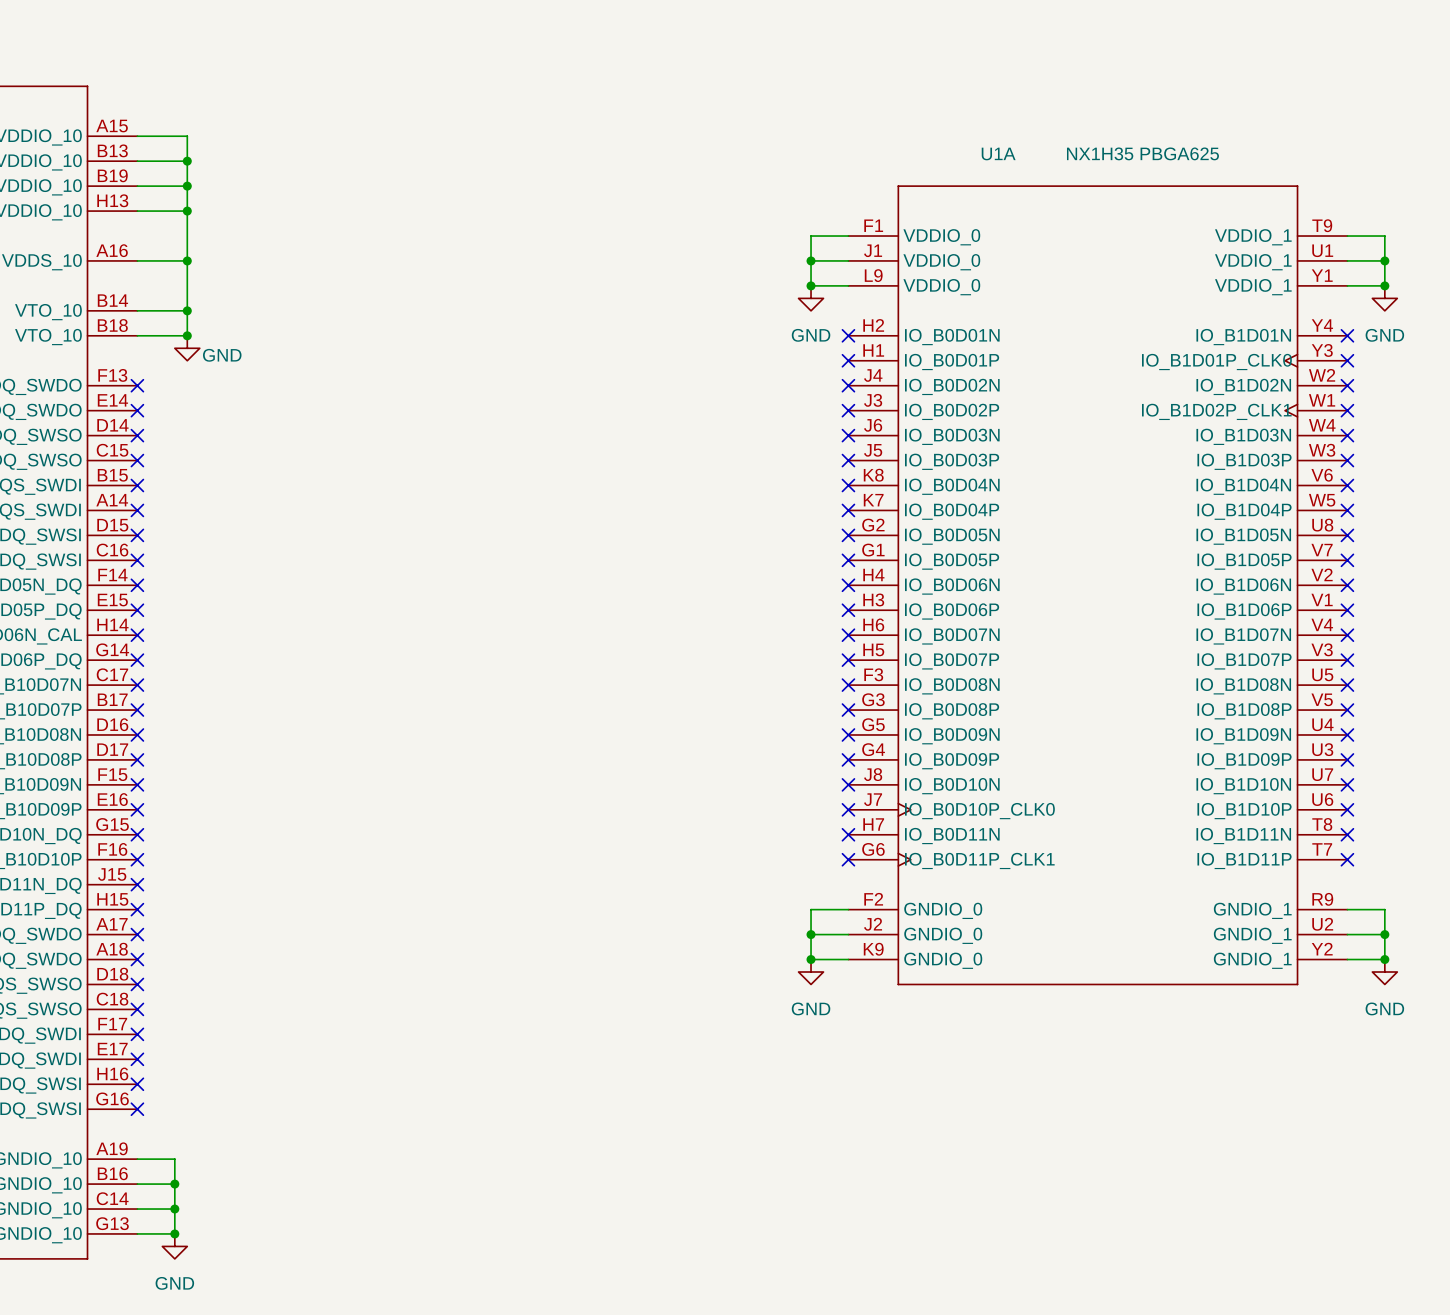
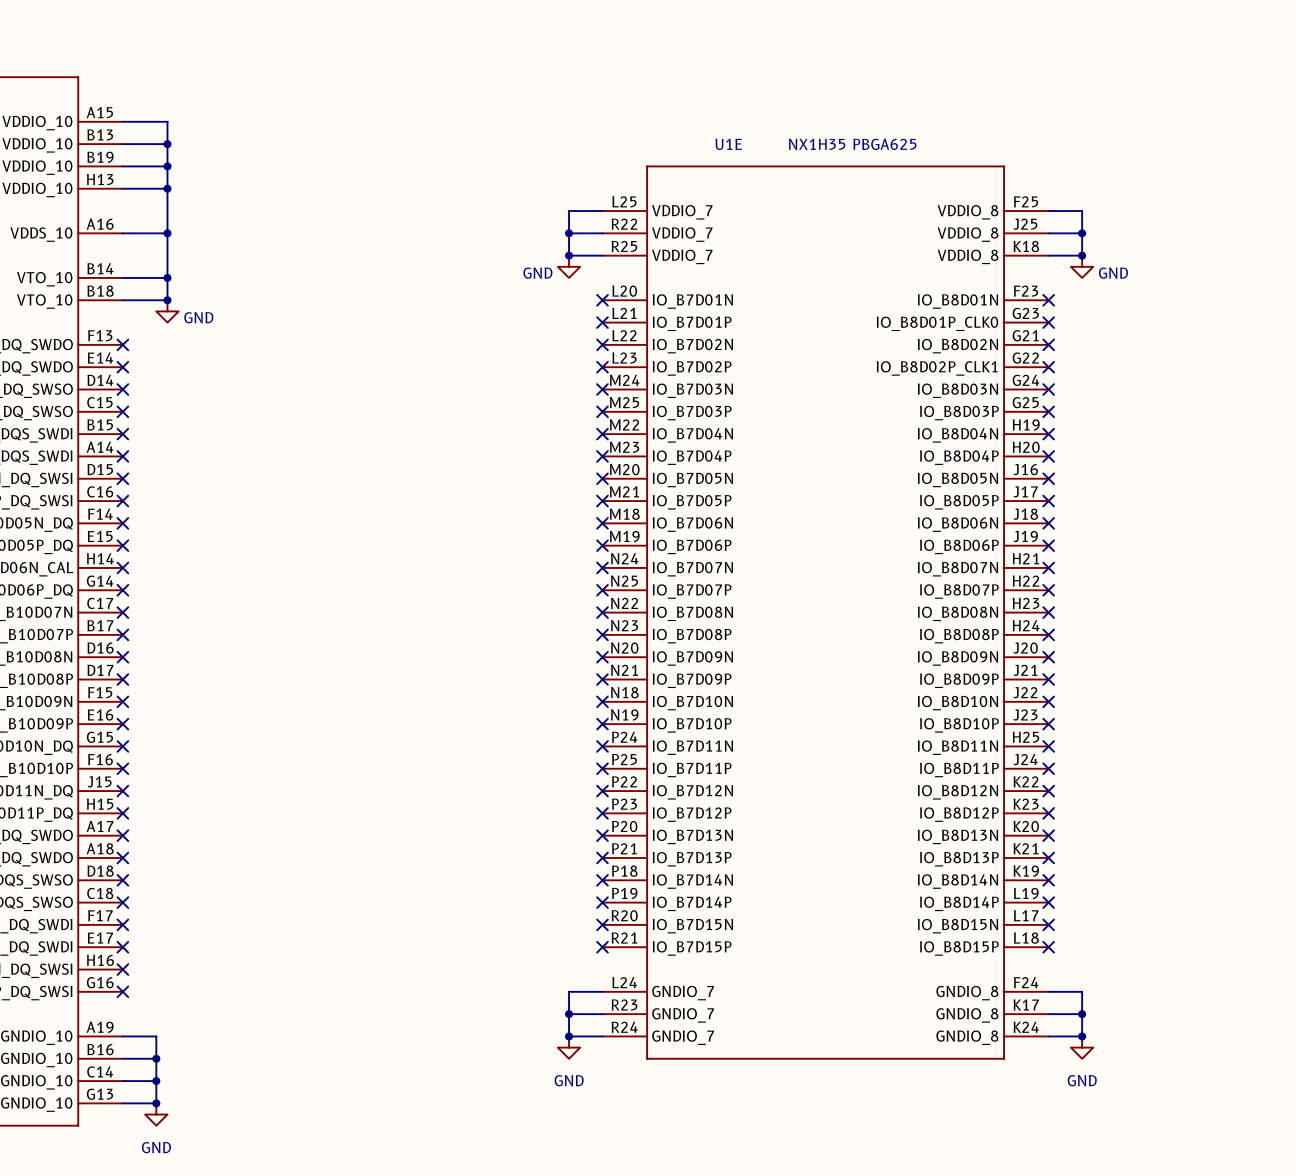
wire: (848, 236) (811, 236) (811, 285) (848, 285) -> (602, 211) (569, 211) (569, 255) (602, 255)
wire: (1347, 236) (1384, 236) (1384, 285) (1347, 285) -> (1048, 211) (1082, 211) (1082, 255) (1048, 255)
junction: none -> (569, 233)
wire: (811, 260) (848, 260) -> (569, 233) (602, 233)
junction: (811, 260) -> none
junction: none -> (1082, 233)
wire: (1347, 260) (1384, 260) -> (1048, 233) (1082, 233)
junction: (1384, 260) -> none
junction: none -> (569, 255)
junction: (811, 285) -> none
junction: none -> (1082, 255)
junction: (1384, 285) -> none
power symbol position: GND (811, 298) -> GND (569, 266)
power symbol position: GND (1384, 298) -> GND (1082, 266)
no-connect mark: none -> (602, 300)
power symbol text position: GND (811, 335) -> GND (537, 273)
no-connect mark: (848, 335) -> none
no-connect mark: none -> (1048, 300)
no-connect mark: (1347, 335) -> none
power symbol text position: GND (1384, 335) -> GND (1113, 273)
no-connect mark: none -> (602, 322)
no-connect mark: (848, 360) -> none
no-connect mark: none -> (1048, 322)
no-connect mark: (1347, 360) -> none
no-connect mark: none -> (602, 344)
no-connect mark: (848, 385) -> none
no-connect mark: none -> (1048, 344)
no-connect mark: (1347, 385) -> none
no-connect mark: none -> (602, 367)
no-connect mark: (848, 410) -> none
no-connect mark: none -> (1048, 367)
no-connect mark: (1347, 410) -> none
no-connect mark: none -> (602, 389)
no-connect mark: (848, 435) -> none
no-connect mark: none -> (1048, 389)
no-connect mark: (1347, 435) -> none
no-connect mark: none -> (602, 411)
no-connect mark: (848, 460) -> none
no-connect mark: none -> (1048, 411)
no-connect mark: (1347, 460) -> none
no-connect mark: none -> (602, 434)
no-connect mark: (848, 485) -> none
no-connect mark: none -> (1048, 434)
no-connect mark: (1347, 485) -> none
no-connect mark: none -> (602, 456)
no-connect mark: (848, 510) -> none
no-connect mark: none -> (1048, 456)
no-connect mark: (1347, 510) -> none
no-connect mark: none -> (602, 478)
no-connect mark: (848, 535) -> none
no-connect mark: none -> (1048, 478)
no-connect mark: (1347, 535) -> none
no-connect mark: none -> (602, 501)
no-connect mark: (848, 560) -> none
no-connect mark: none -> (1048, 501)
no-connect mark: (1347, 560) -> none
no-connect mark: none -> (602, 523)
no-connect mark: (848, 585) -> none
U1A: NX1H35 PBGA625 (1097, 585) -> none
no-connect mark: none -> (1048, 523)
no-connect mark: (1347, 585) -> none
no-connect mark: none -> (602, 545)
no-connect mark: (848, 610) -> none
no-connect mark: none -> (1048, 545)
no-connect mark: (1347, 610) -> none
no-connect mark: none -> (602, 567)
no-connect mark: (848, 635) -> none
no-connect mark: none -> (1048, 567)
no-connect mark: (1347, 635) -> none
no-connect mark: none -> (602, 590)
no-connect mark: (848, 660) -> none
no-connect mark: none -> (1048, 590)
no-connect mark: (1347, 660) -> none
no-connect mark: none -> (602, 612)
no-connect mark: (848, 685) -> none
U1E: none -> NX1H35 PBGA625 (825, 612)
no-connect mark: none -> (1048, 612)
no-connect mark: (1347, 685) -> none
no-connect mark: none -> (602, 634)
no-connect mark: (848, 710) -> none
no-connect mark: none -> (1048, 634)
no-connect mark: (1347, 710) -> none
no-connect mark: none -> (602, 657)
no-connect mark: (848, 734) -> none
no-connect mark: none -> (1048, 657)
no-connect mark: (1347, 734) -> none
no-connect mark: none -> (602, 679)
no-connect mark: (848, 759) -> none
no-connect mark: none -> (1048, 679)
no-connect mark: (1347, 759) -> none
no-connect mark: none -> (602, 701)
no-connect mark: (848, 784) -> none
no-connect mark: none -> (1048, 701)
no-connect mark: (1347, 784) -> none
no-connect mark: none -> (602, 724)
no-connect mark: (848, 809) -> none
no-connect mark: none -> (1048, 724)
no-connect mark: (1347, 809) -> none
no-connect mark: none -> (602, 746)
no-connect mark: (848, 834) -> none
no-connect mark: none -> (1048, 746)
no-connect mark: (1347, 834) -> none
no-connect mark: none -> (602, 768)
no-connect mark: (848, 859) -> none
no-connect mark: none -> (1048, 768)
no-connect mark: (1347, 859) -> none
no-connect mark: none -> (602, 791)
no-connect mark: none -> (1048, 791)
no-connect mark: none -> (602, 813)
wire: (848, 909) (811, 909) (811, 959) (848, 959) -> none
no-connect mark: none -> (1048, 813)
wire: (1347, 909) (1384, 909) (1384, 959) (1347, 959) -> none
no-connect mark: none -> (602, 835)
wire: (811, 934) (848, 934) -> none
junction: (811, 934) -> none
no-connect mark: none -> (1048, 835)
wire: (1347, 934) (1384, 934) -> none
junction: (1384, 934) -> none
no-connect mark: none -> (602, 857)
junction: (811, 959) -> none
no-connect mark: none -> (1048, 857)
junction: (1384, 959) -> none
power symbol: GND (811, 972) -> none
power symbol: GND (1384, 972) -> none
no-connect mark: none -> (602, 880)
no-connect mark: none -> (1048, 880)
no-connect mark: none -> (602, 902)
no-connect mark: none -> (1048, 902)
no-connect mark: none -> (602, 924)
no-connect mark: none -> (1048, 924)
no-connect mark: none -> (602, 947)
no-connect mark: none -> (1048, 947)
wire: none -> (602, 991) (569, 991) (569, 1036) (602, 1036)
wire: none -> (1048, 991) (1082, 991) (1082, 1036) (1048, 1036)
wire: none -> (569, 1014) (602, 1014)
junction: none -> (569, 1014)
wire: none -> (1048, 1014) (1082, 1014)
junction: none -> (1082, 1014)
junction: none -> (569, 1036)
junction: none -> (1082, 1036)
power symbol: none -> GND (569, 1047)
power symbol: none -> GND (1082, 1047)

